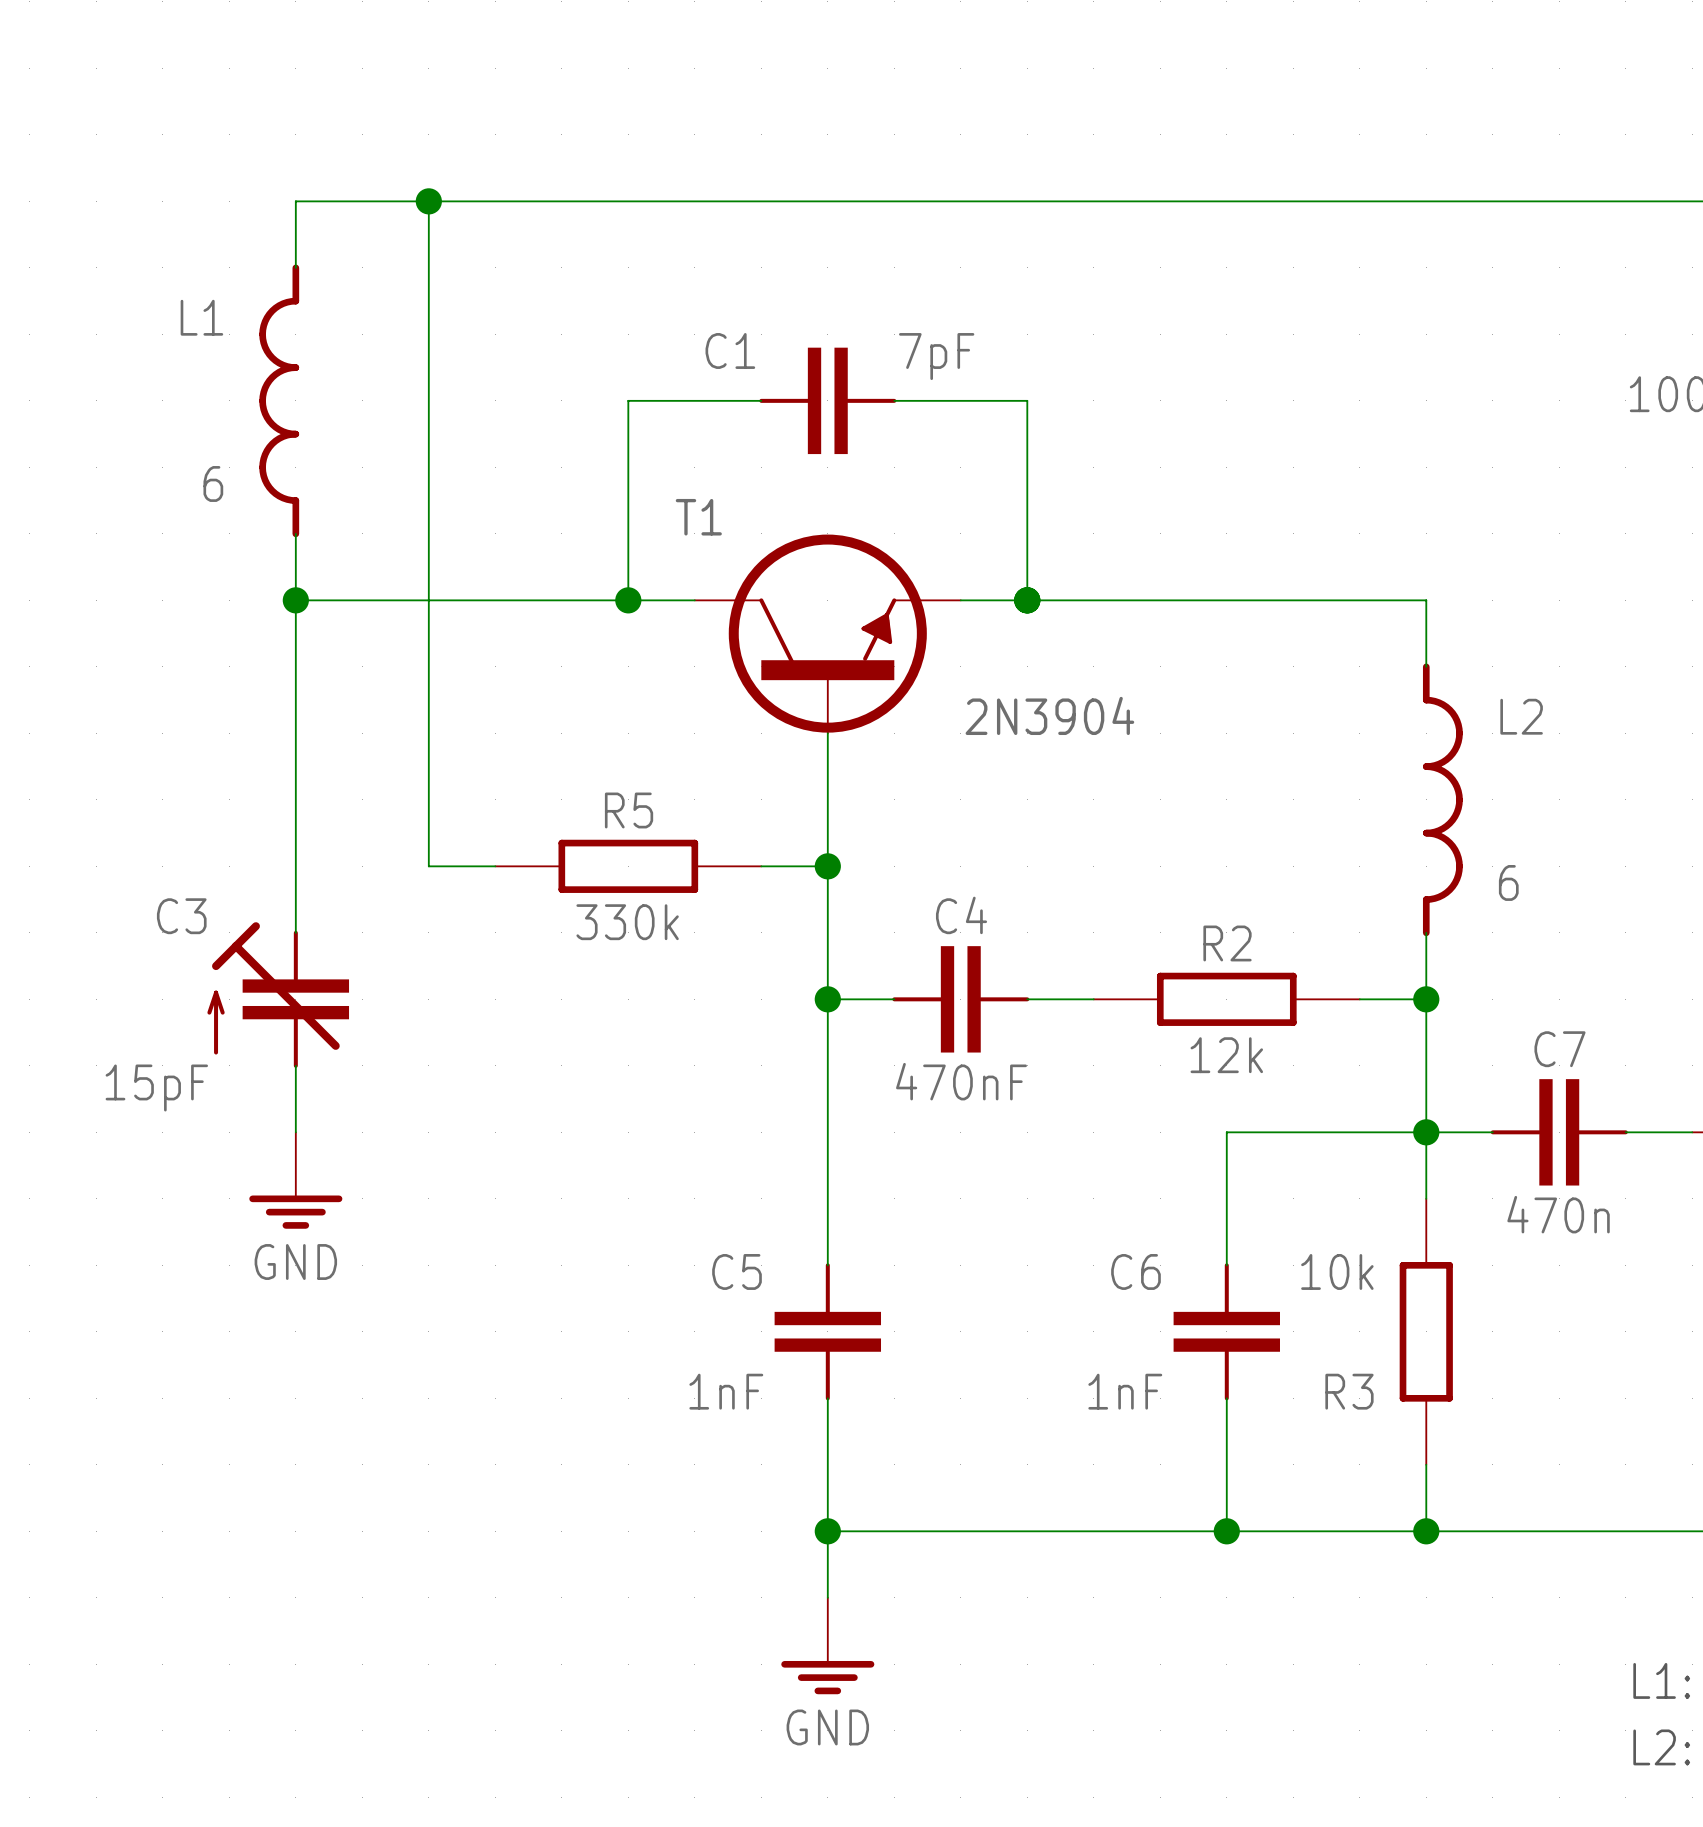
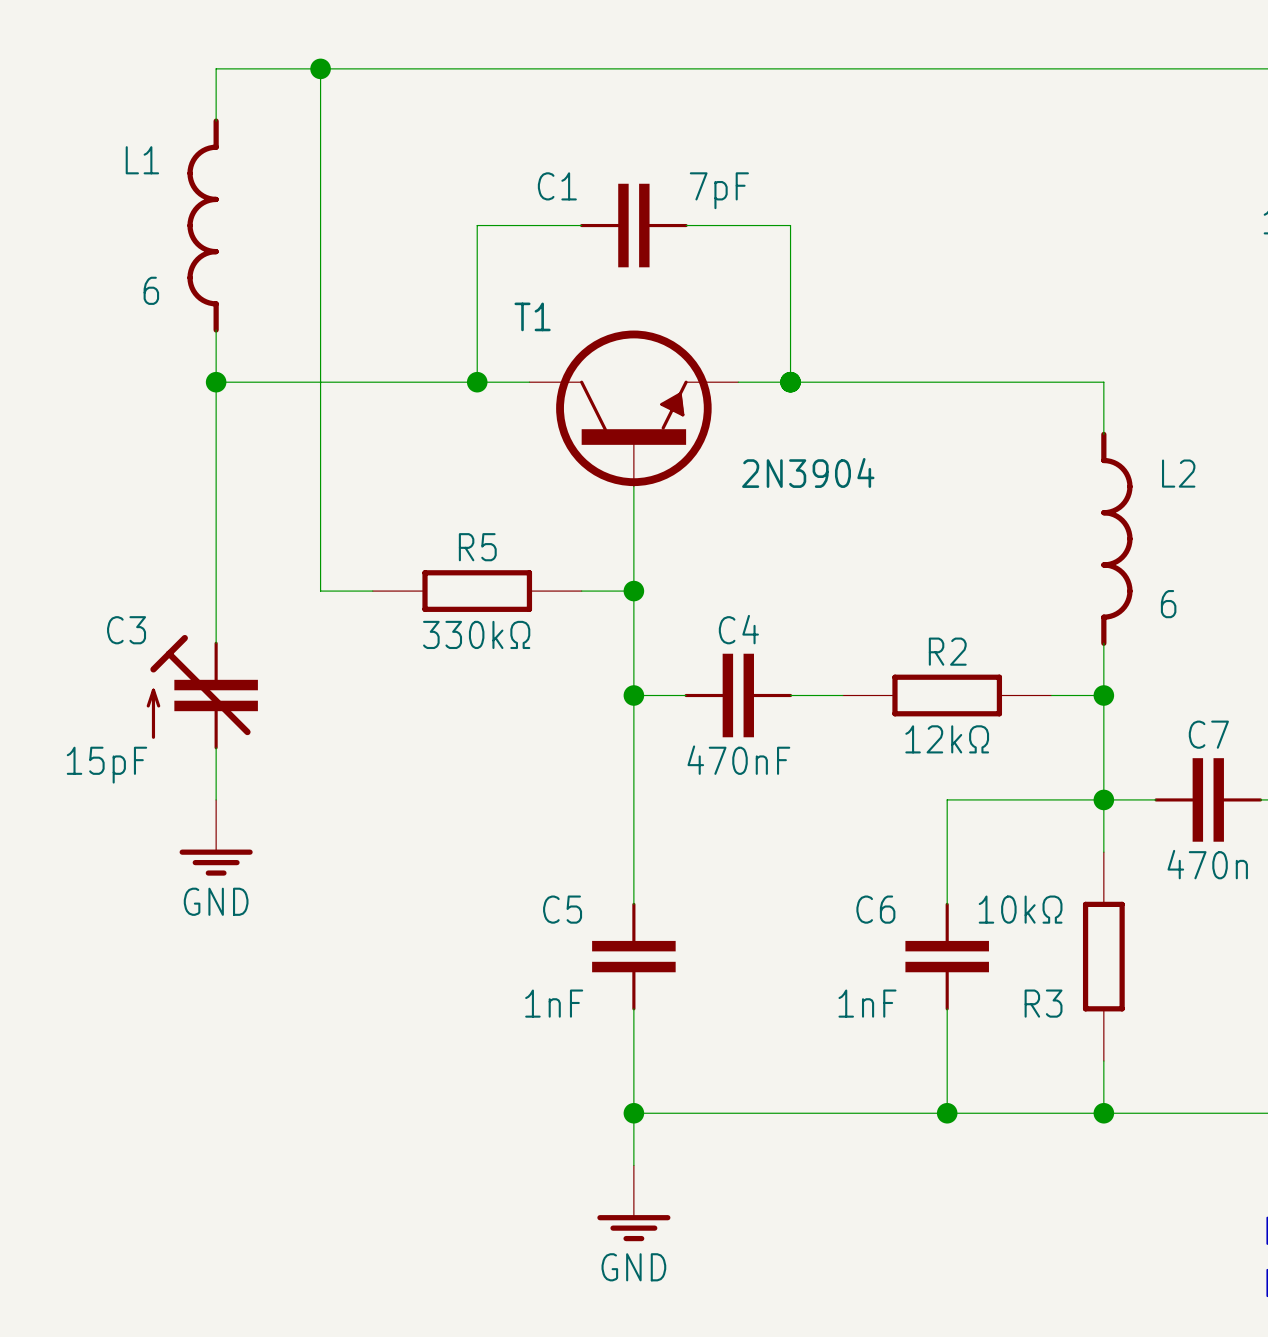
R5 value: 330k (627, 922) -> 330kΩ (476, 634)
R2 value: 12k (1226, 1055) -> 12kΩ (947, 739)
R3 value: 10k (1337, 1271) -> 10kΩ (1020, 909)

